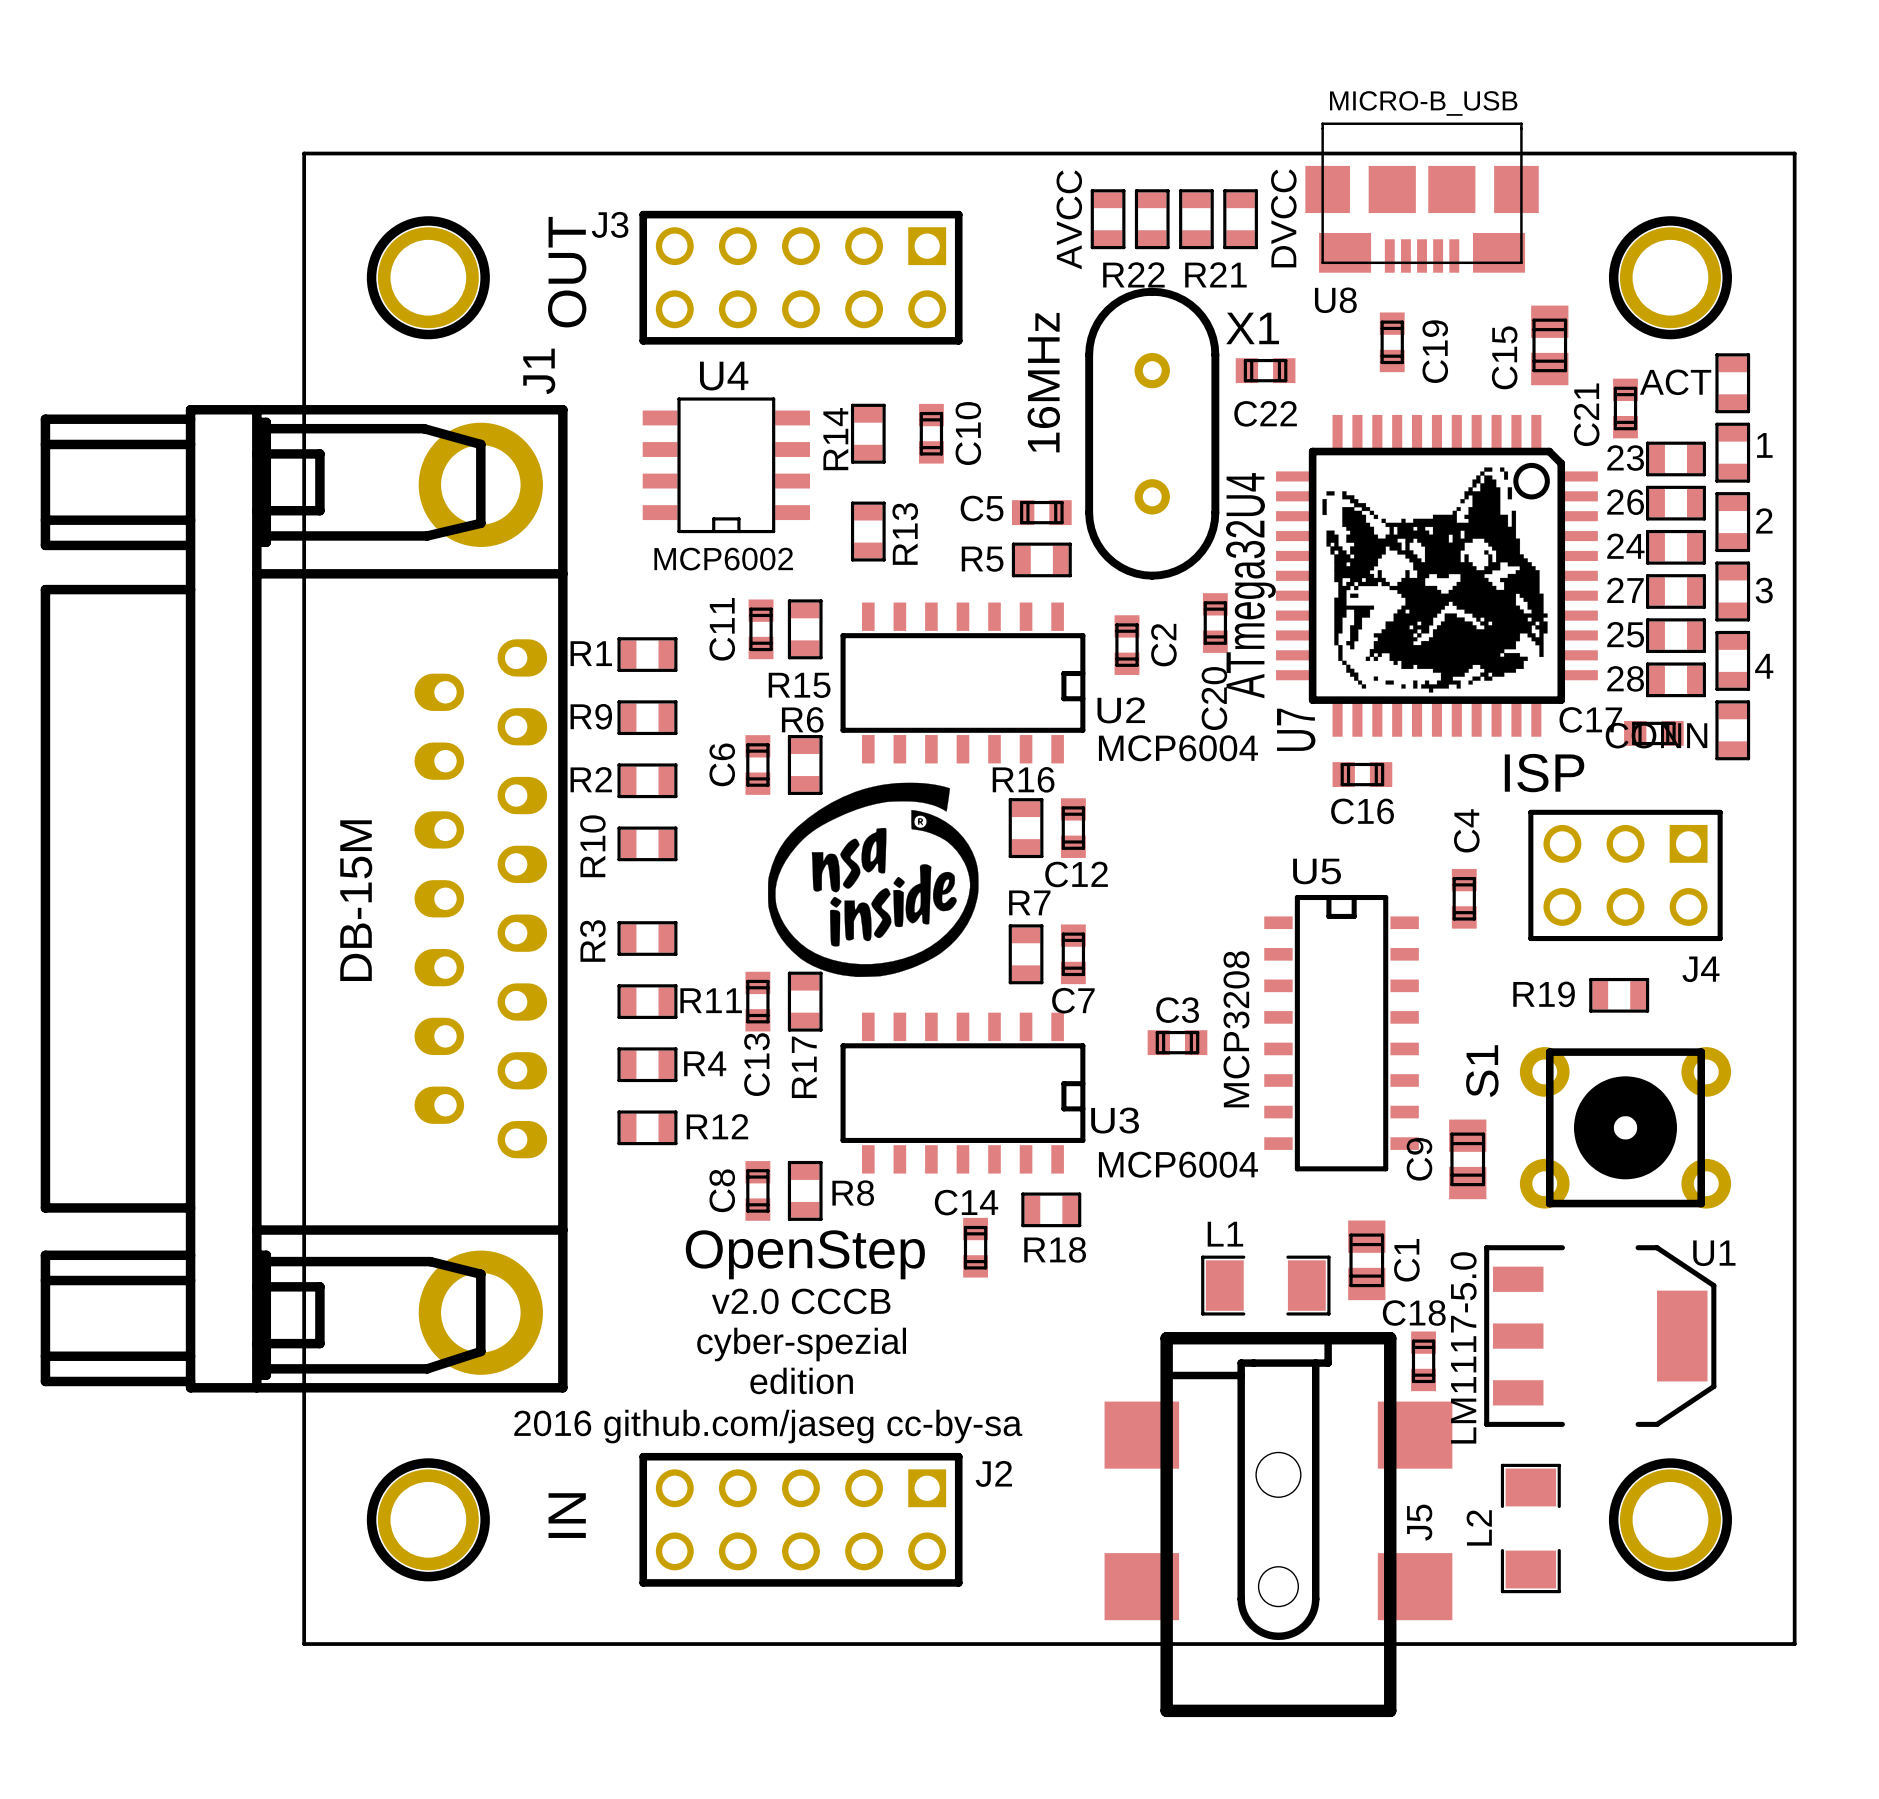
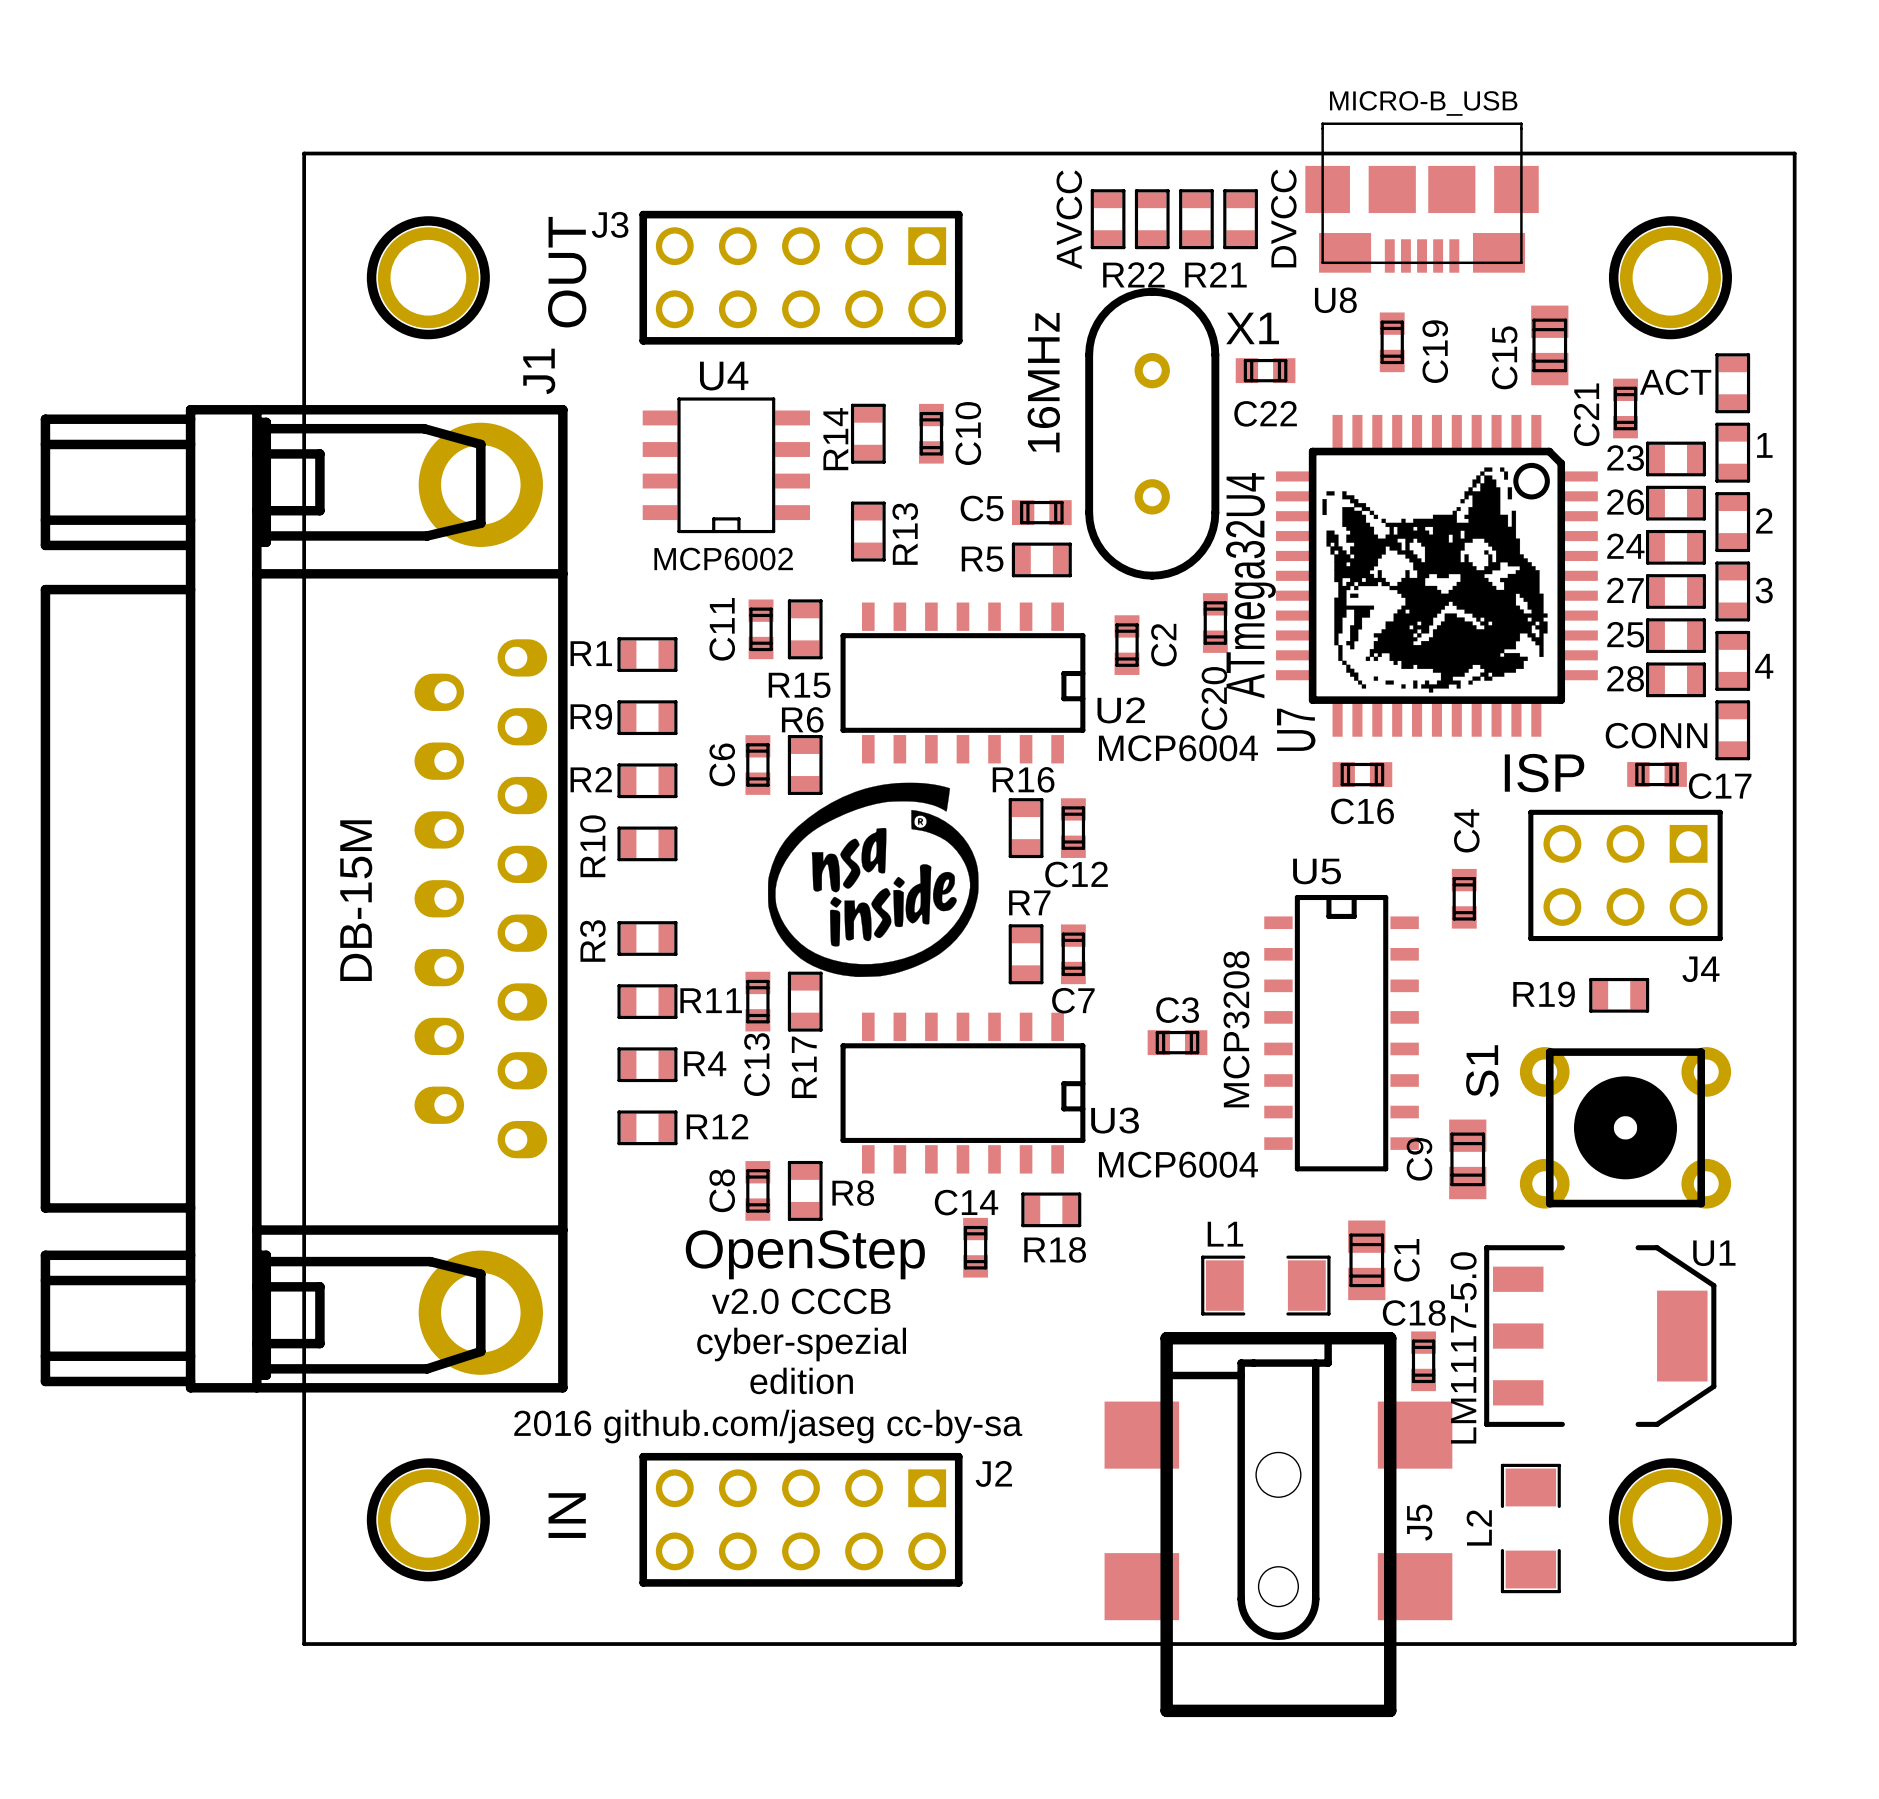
C17 rotation: 0° (1653, 733) -> 180° (1657, 774)
C17 position: (1653, 733) -> (1657, 774)

